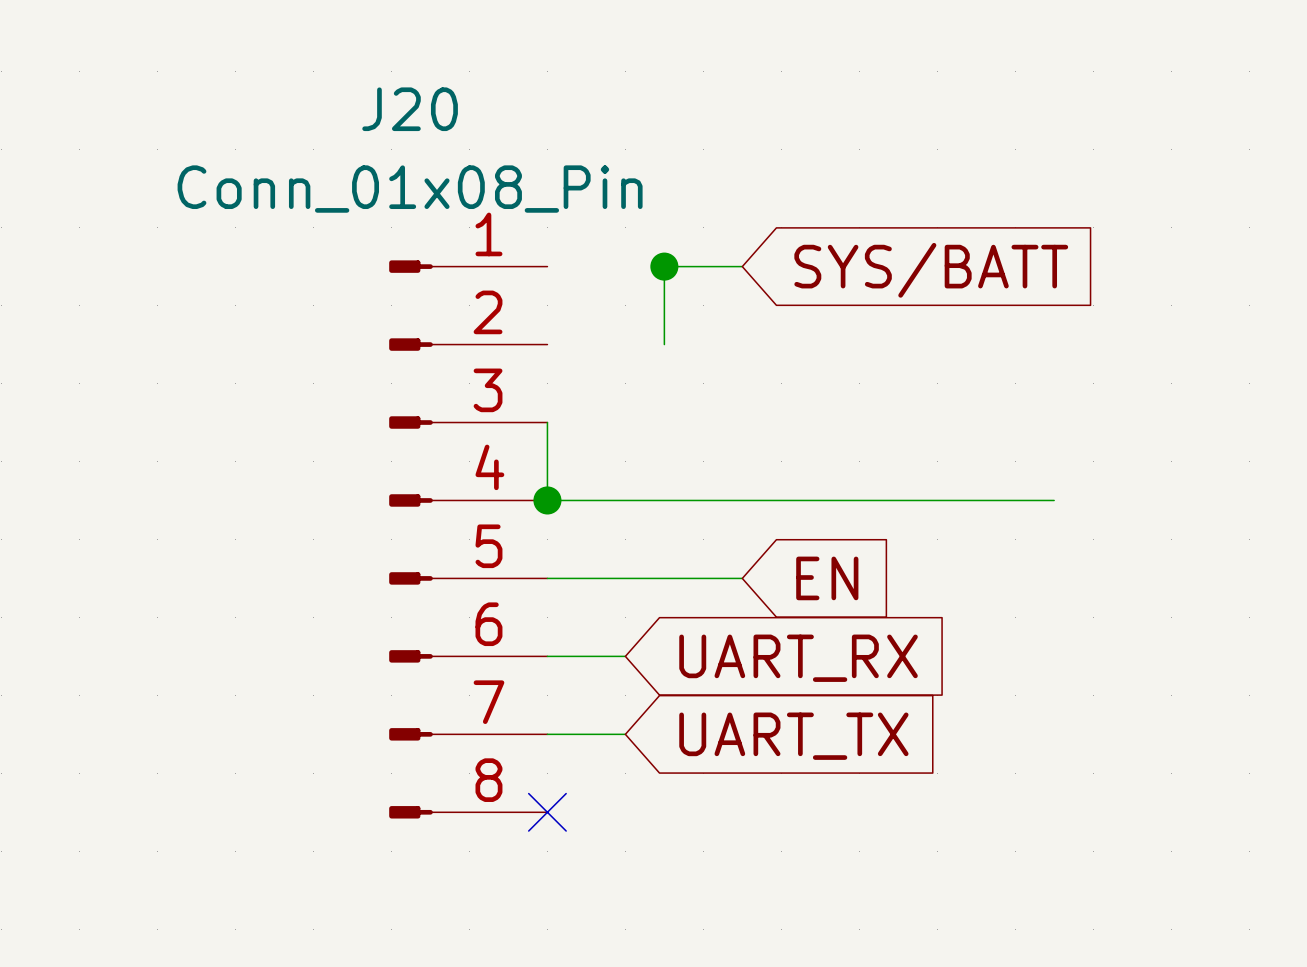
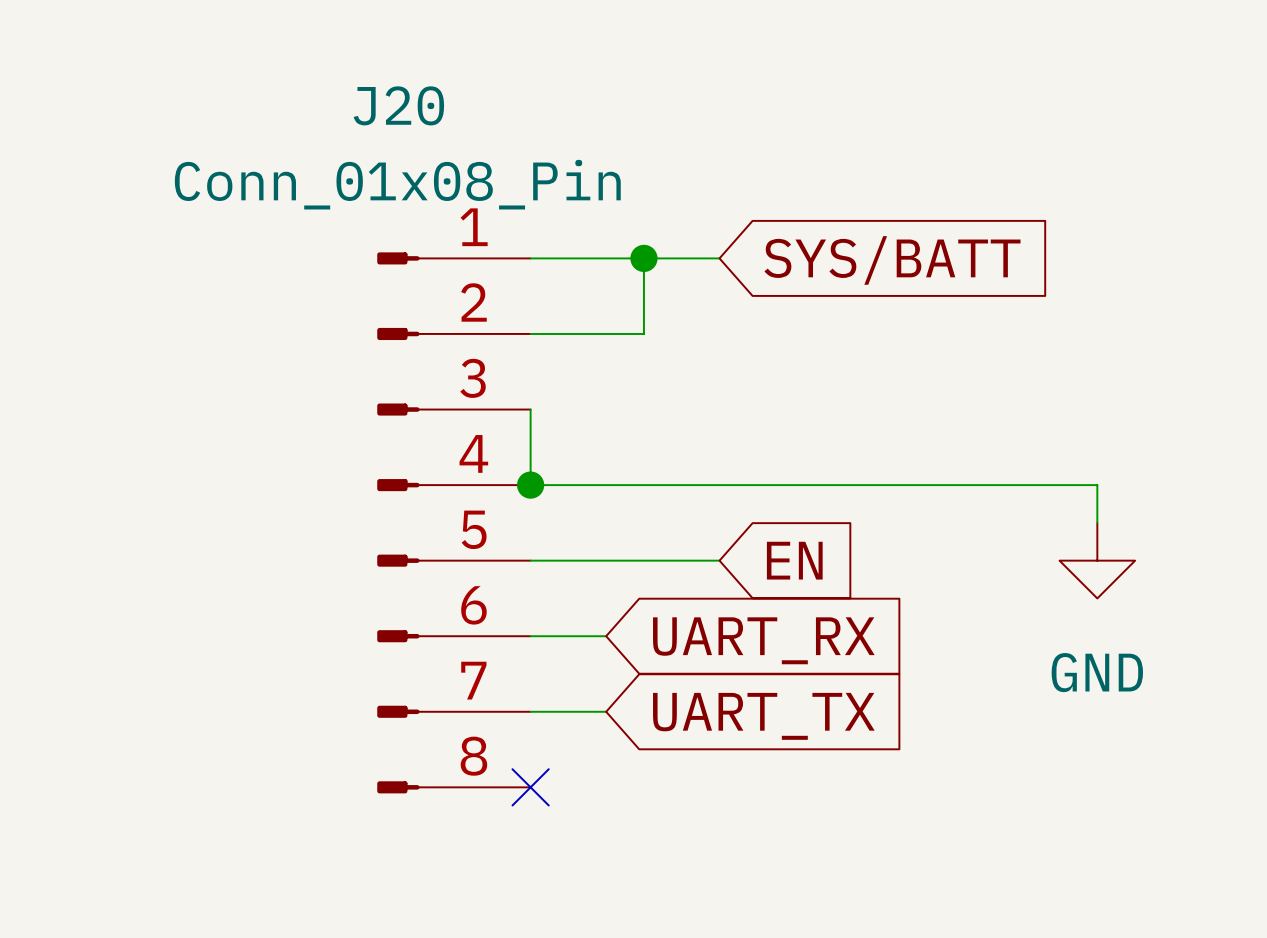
wire: none -> (530, 258) (643, 258)
wire: none -> (530, 333) (643, 333)
wire: none -> (1021, 485) (1097, 485) (1097, 522)
power symbol: none -> GND (1097, 560)

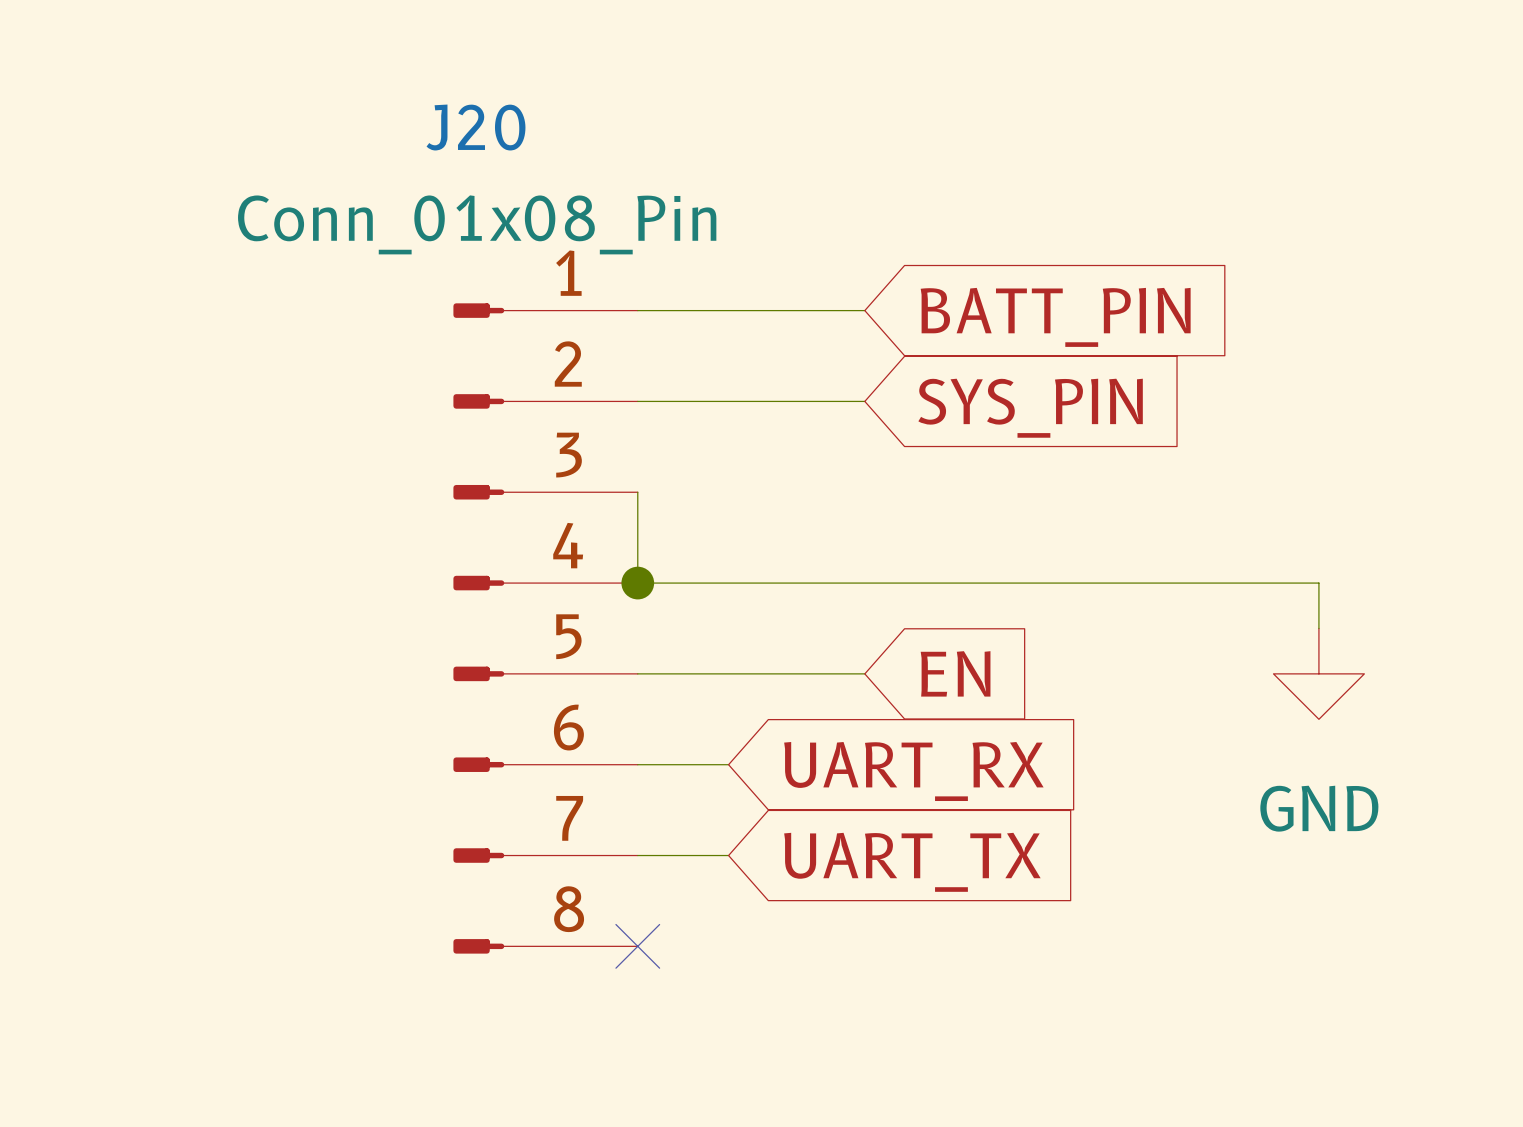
wire: (643, 258) (643, 333) -> (864, 401) (774, 401)
junction: (643, 258) -> none
global label: SYS/BATT (892, 260) -> BATT_PIN (1055, 317)
global label: none -> SYS_PIN (1030, 408)

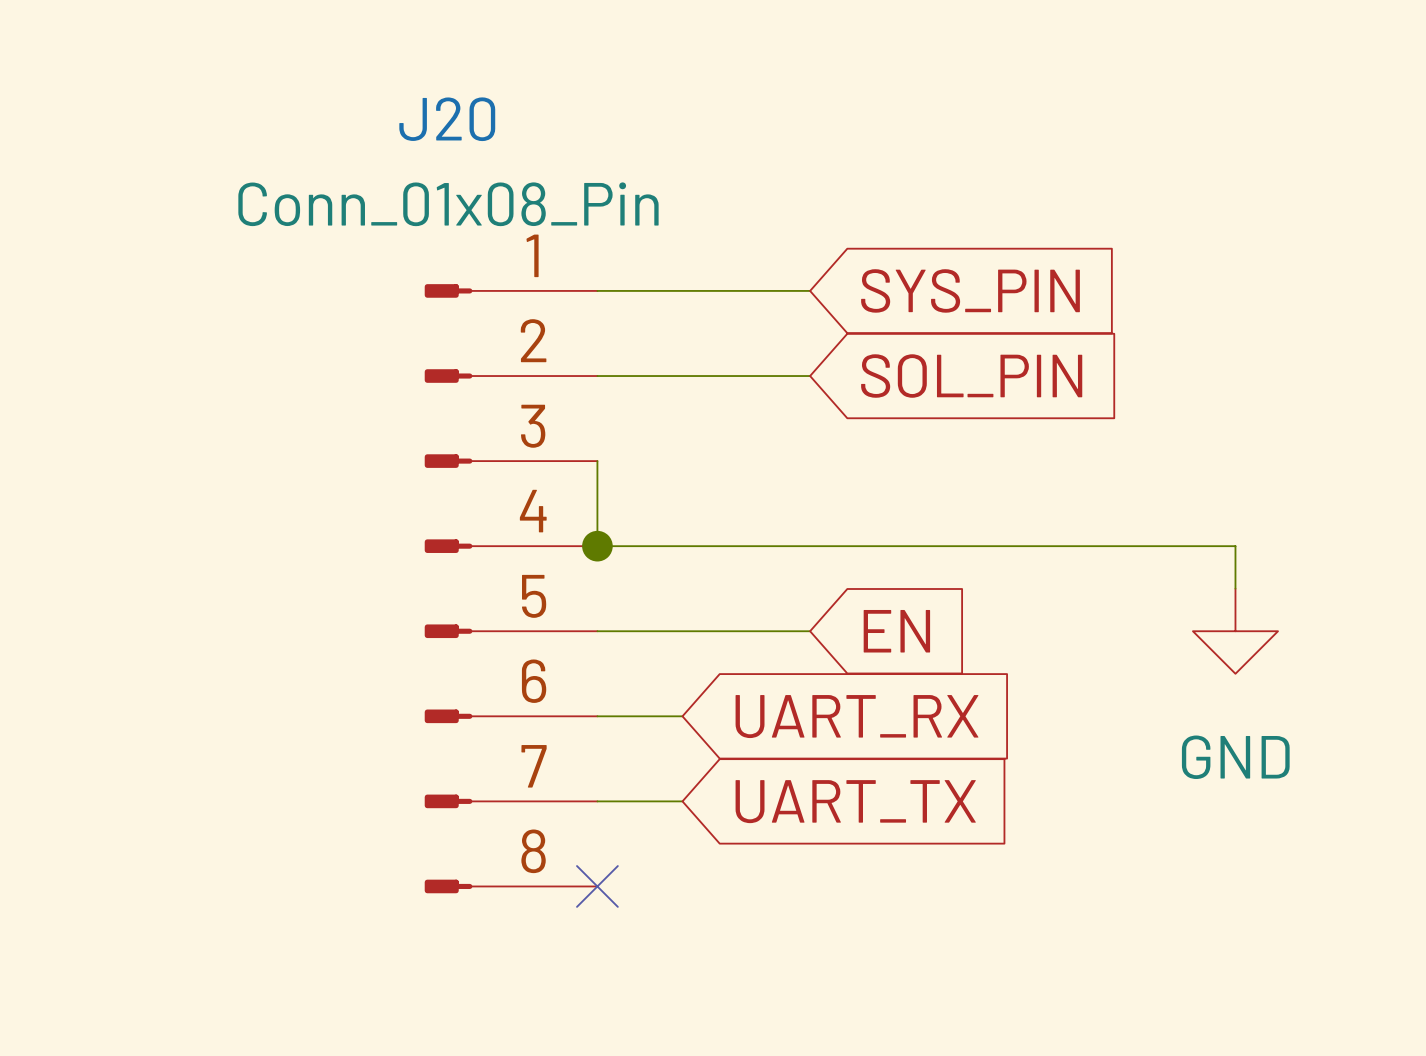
global label: BATT_PIN (1055, 317) -> SYS_PIN (970, 290)
global label: SYS_PIN (1030, 408) -> SOL_PIN (971, 376)

